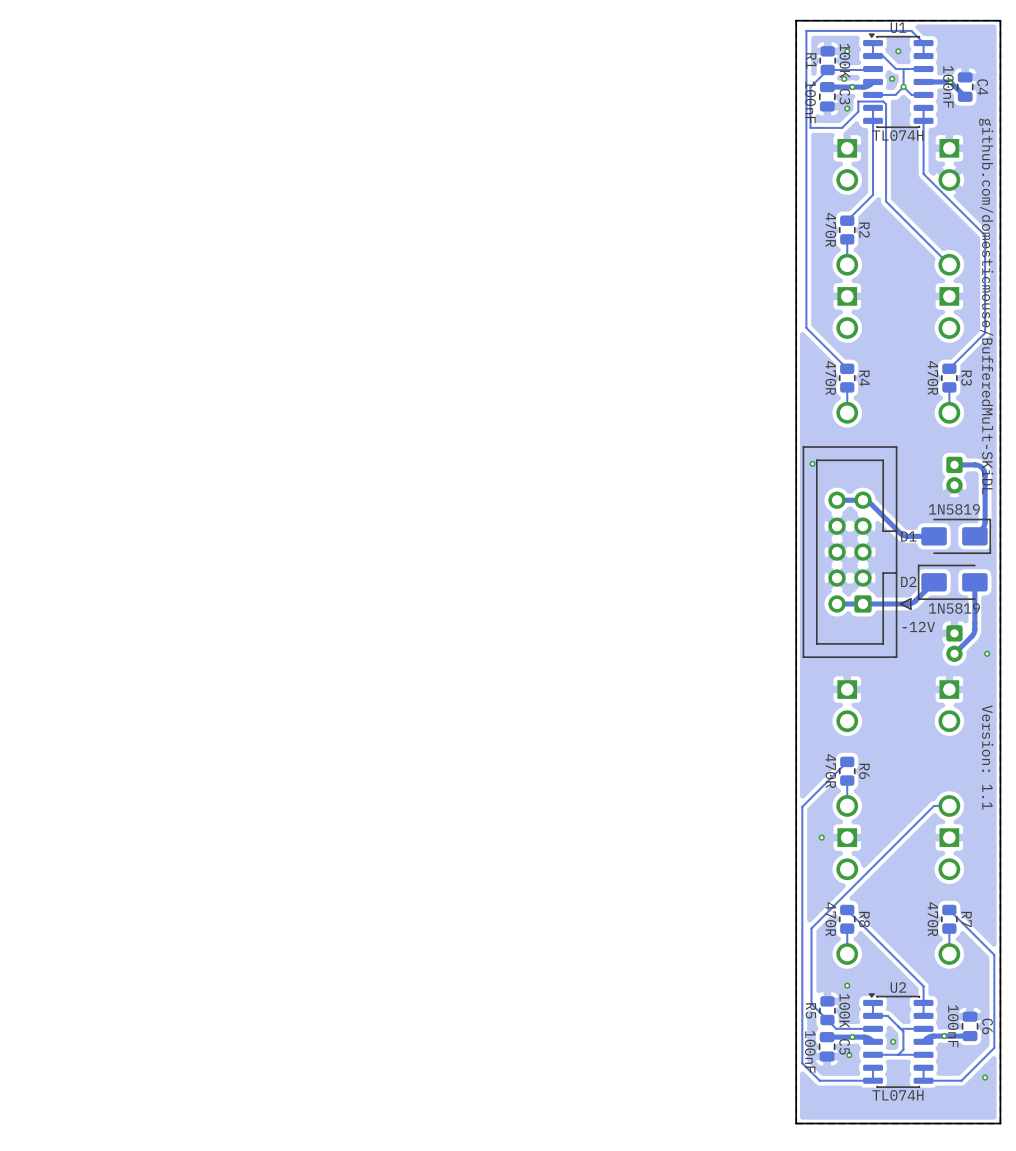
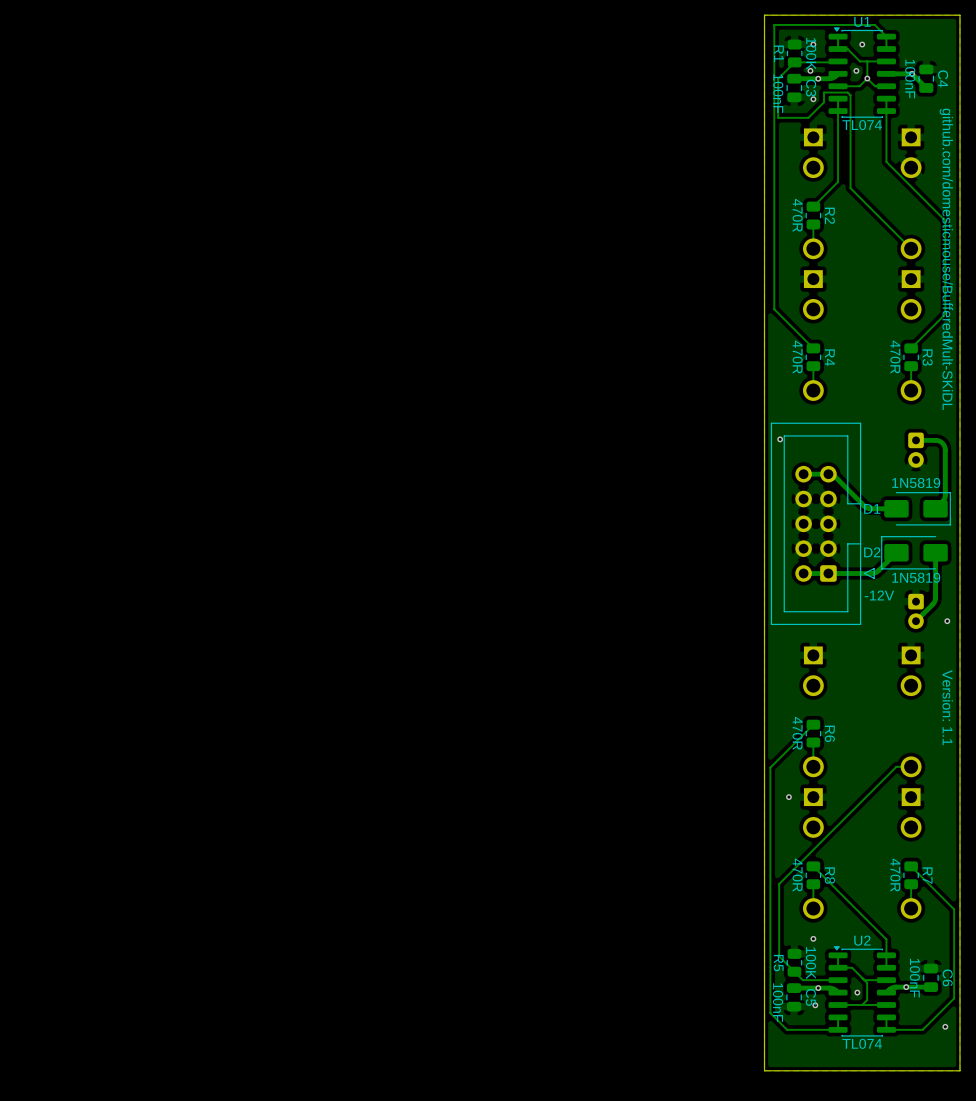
U1 value: TL074H (897, 135) -> TL074 (862, 125)
U2 value: TL074H (897, 1095) -> TL074 (862, 1043)

